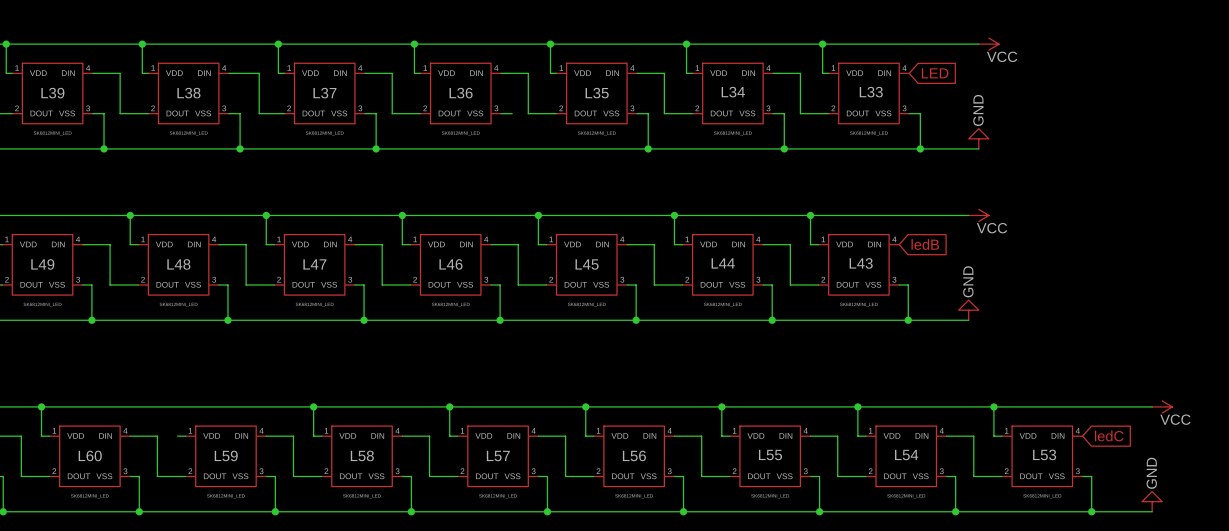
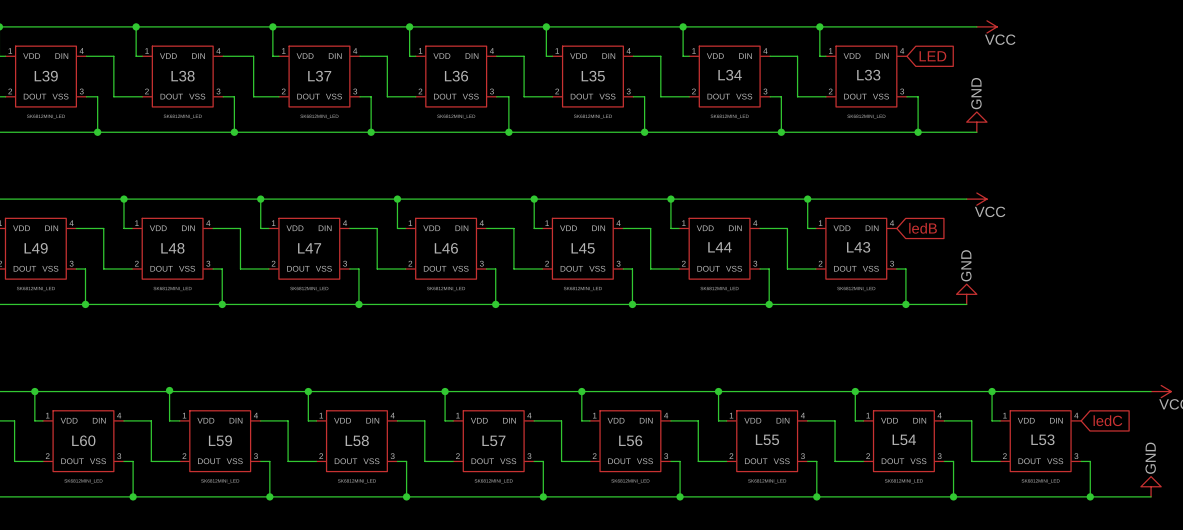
wire: none -> (507, 96) (508, 132)
junction: none -> (508, 132)
wire: none -> (169, 390) (169, 420) (171, 420)
junction: none -> (169, 390)

